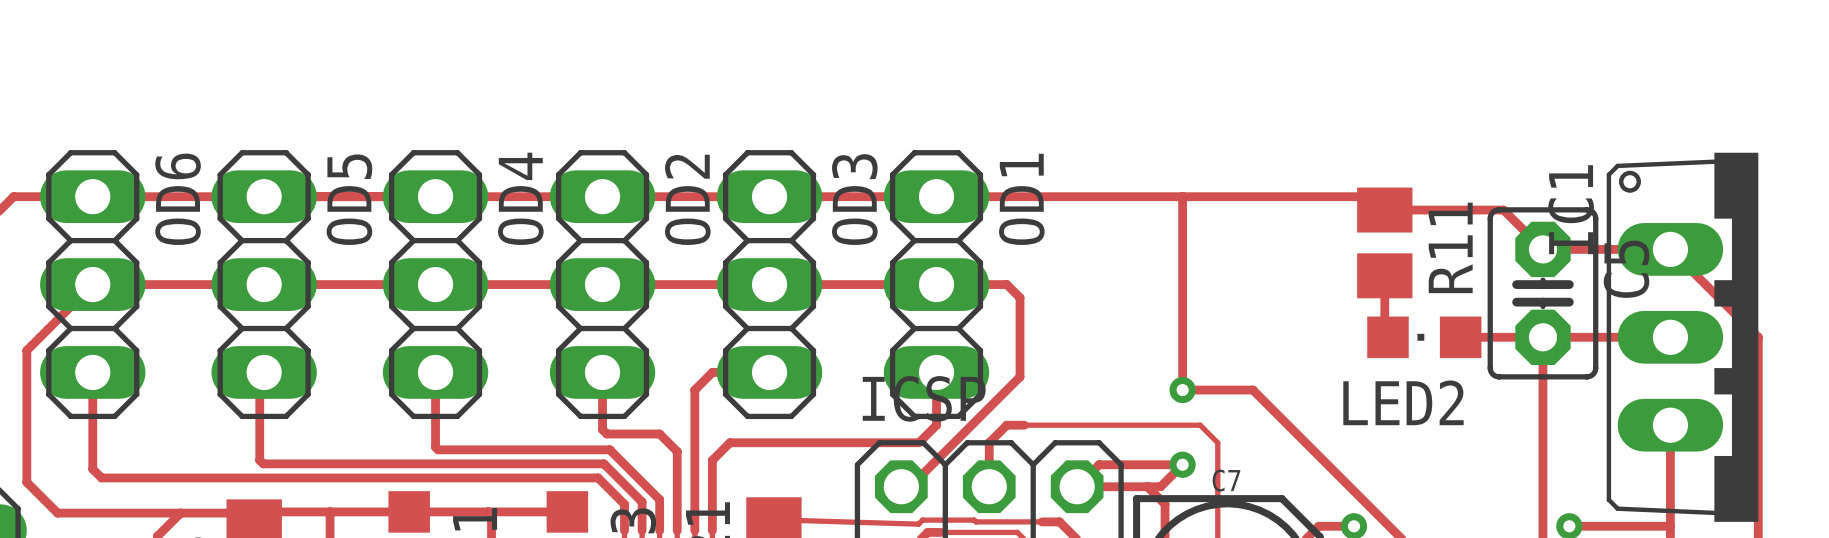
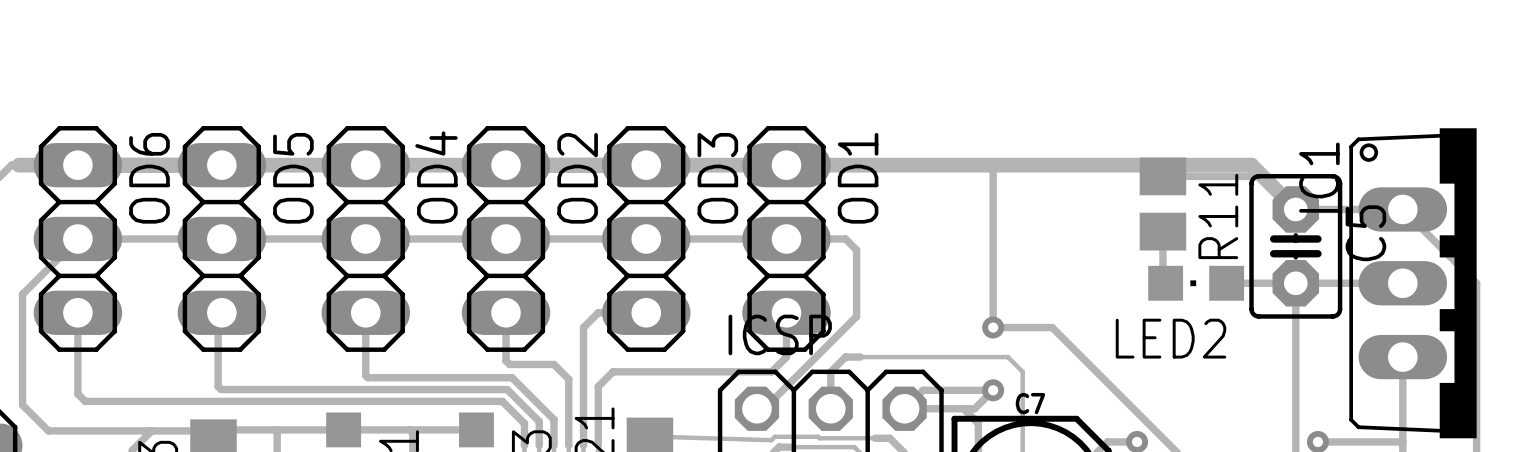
track width: thin (22, 196) (1375, 196) (1389, 210) -> thick (18, 165) (1155, 165) (1166, 176)
track: none -> (1155, 165) (1251, 165) (1295, 209)

